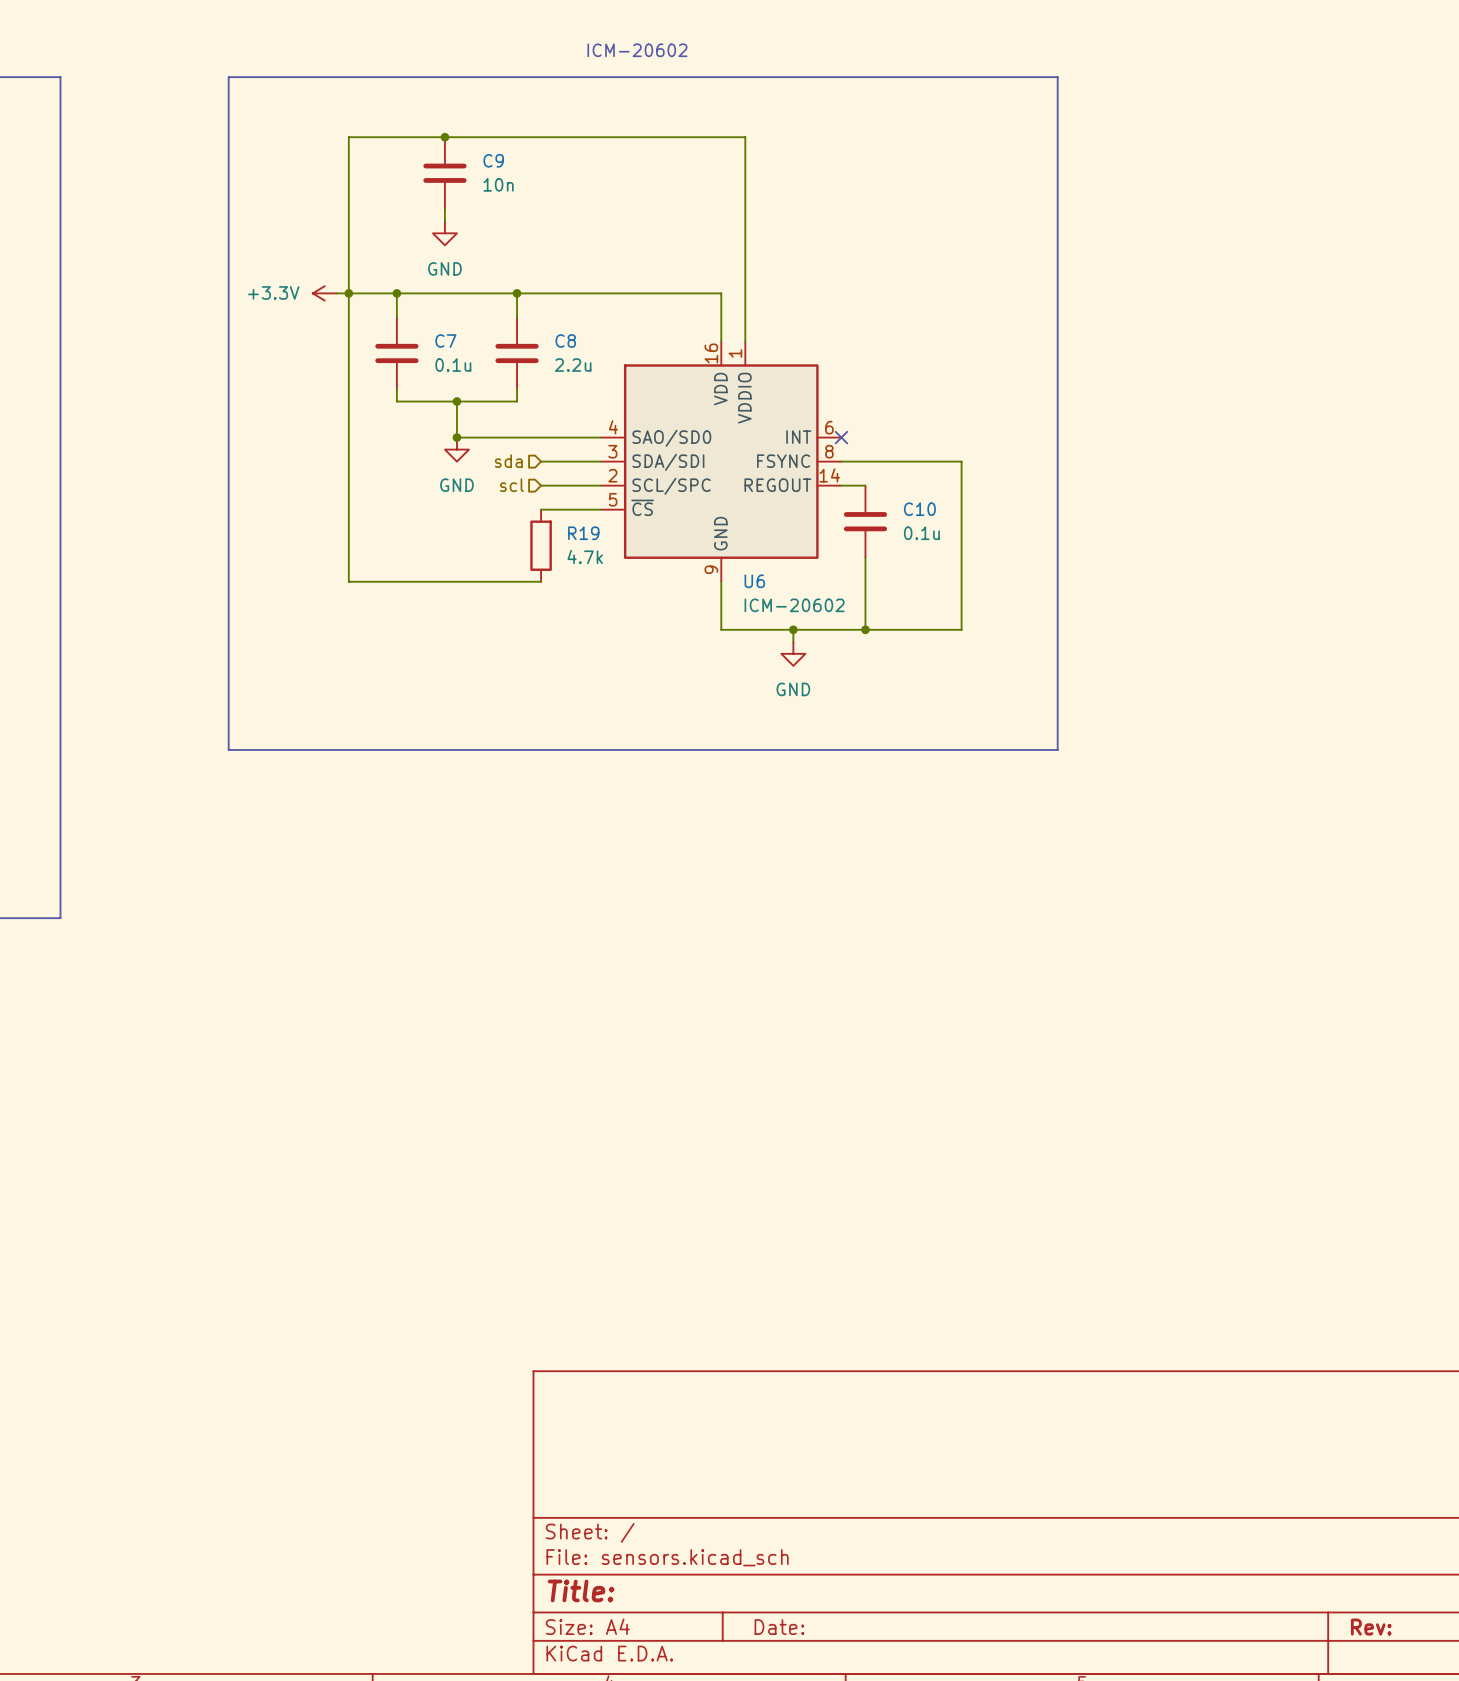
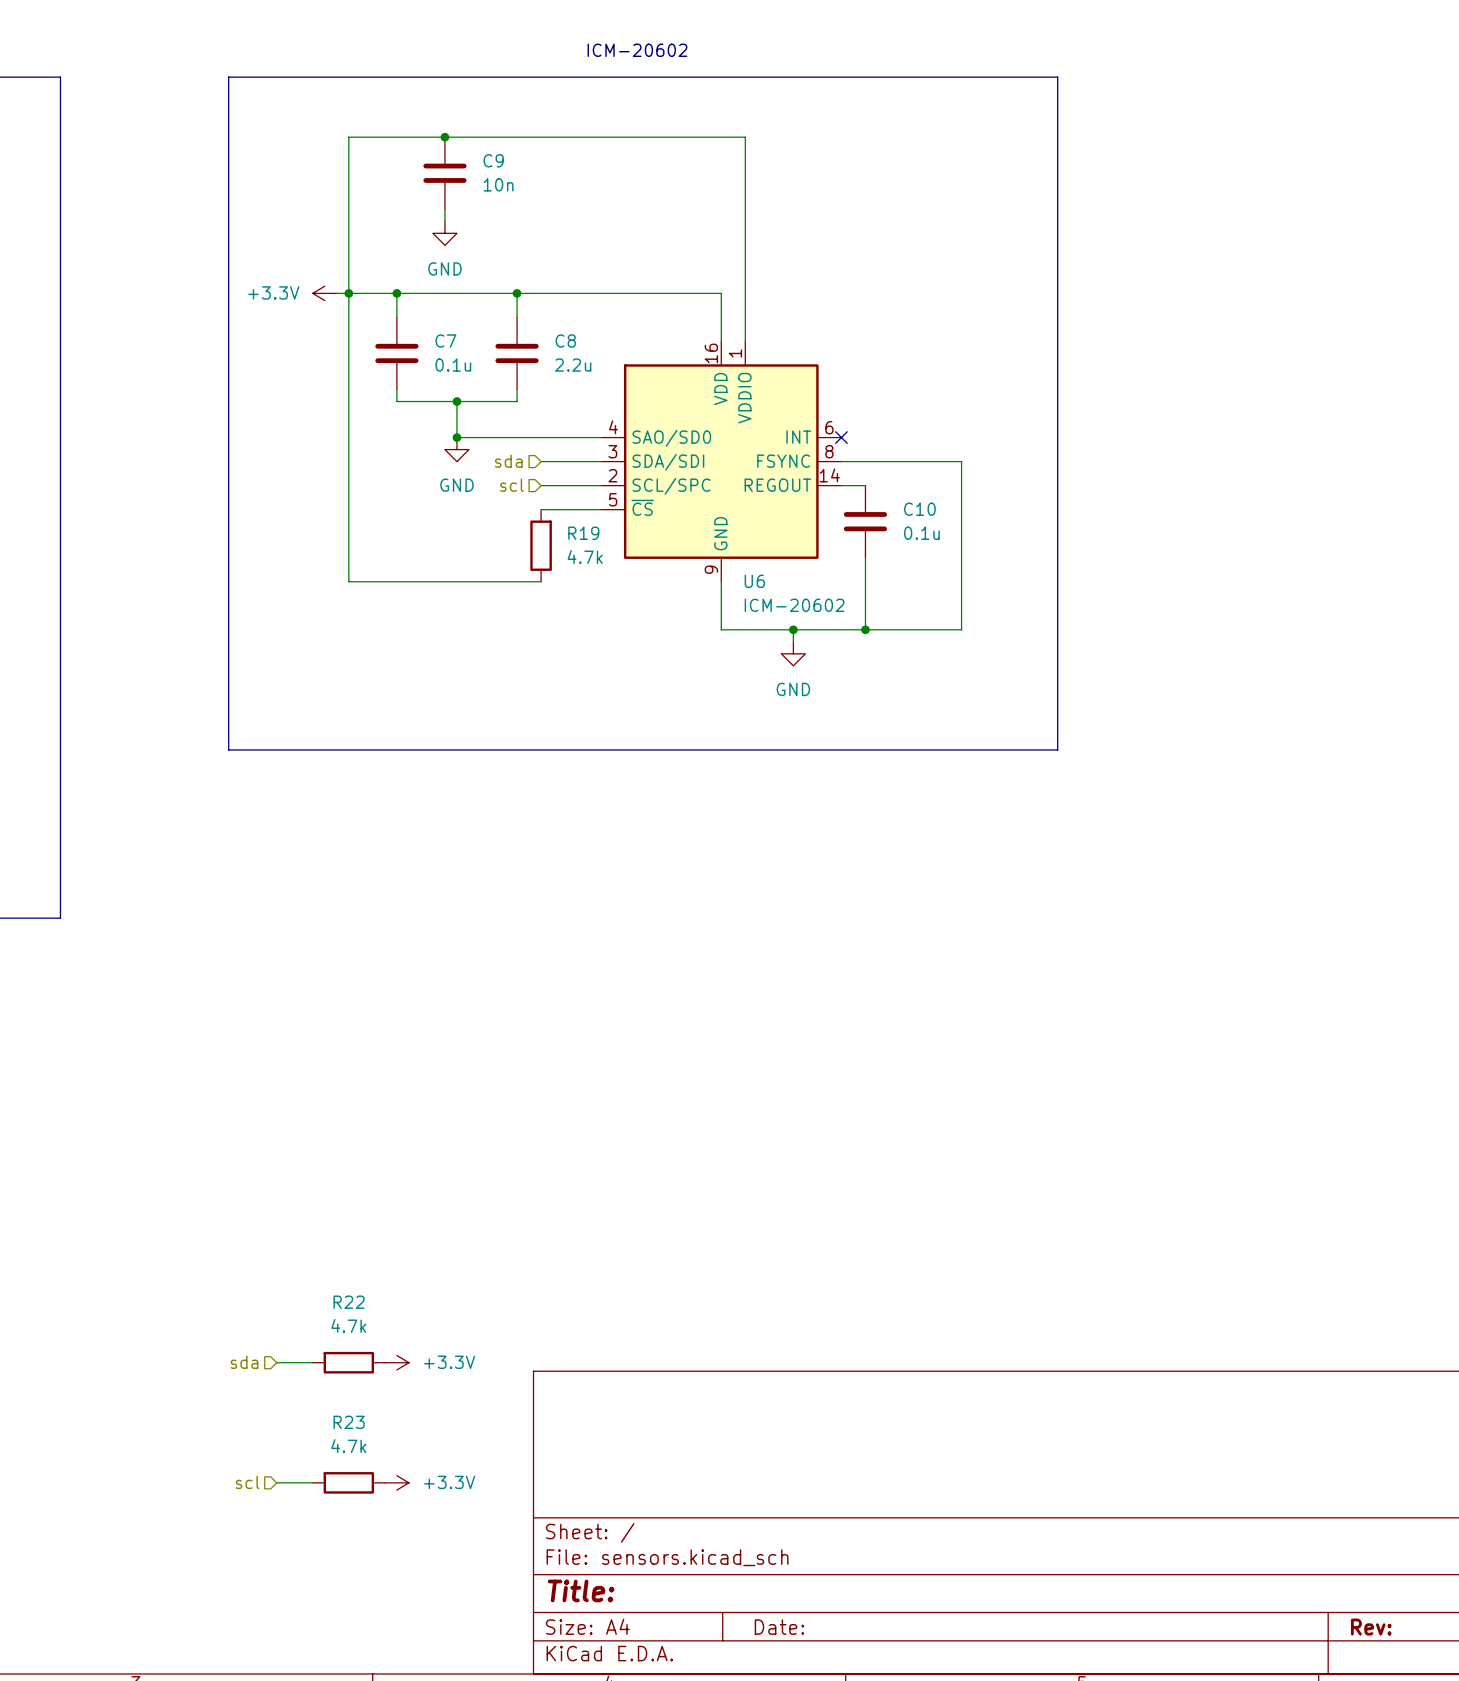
hierarchical label: none -> sda (244, 1362)
wire: none -> (276, 1362) (312, 1362)
R22: none -> 4.7k (348, 1362)
power symbol: none -> +3.3V (396, 1362)
hierarchical label: none -> scl (247, 1482)
wire: none -> (276, 1482) (312, 1482)
R23: none -> 4.7k (348, 1482)
power symbol: none -> +3.3V (396, 1482)

